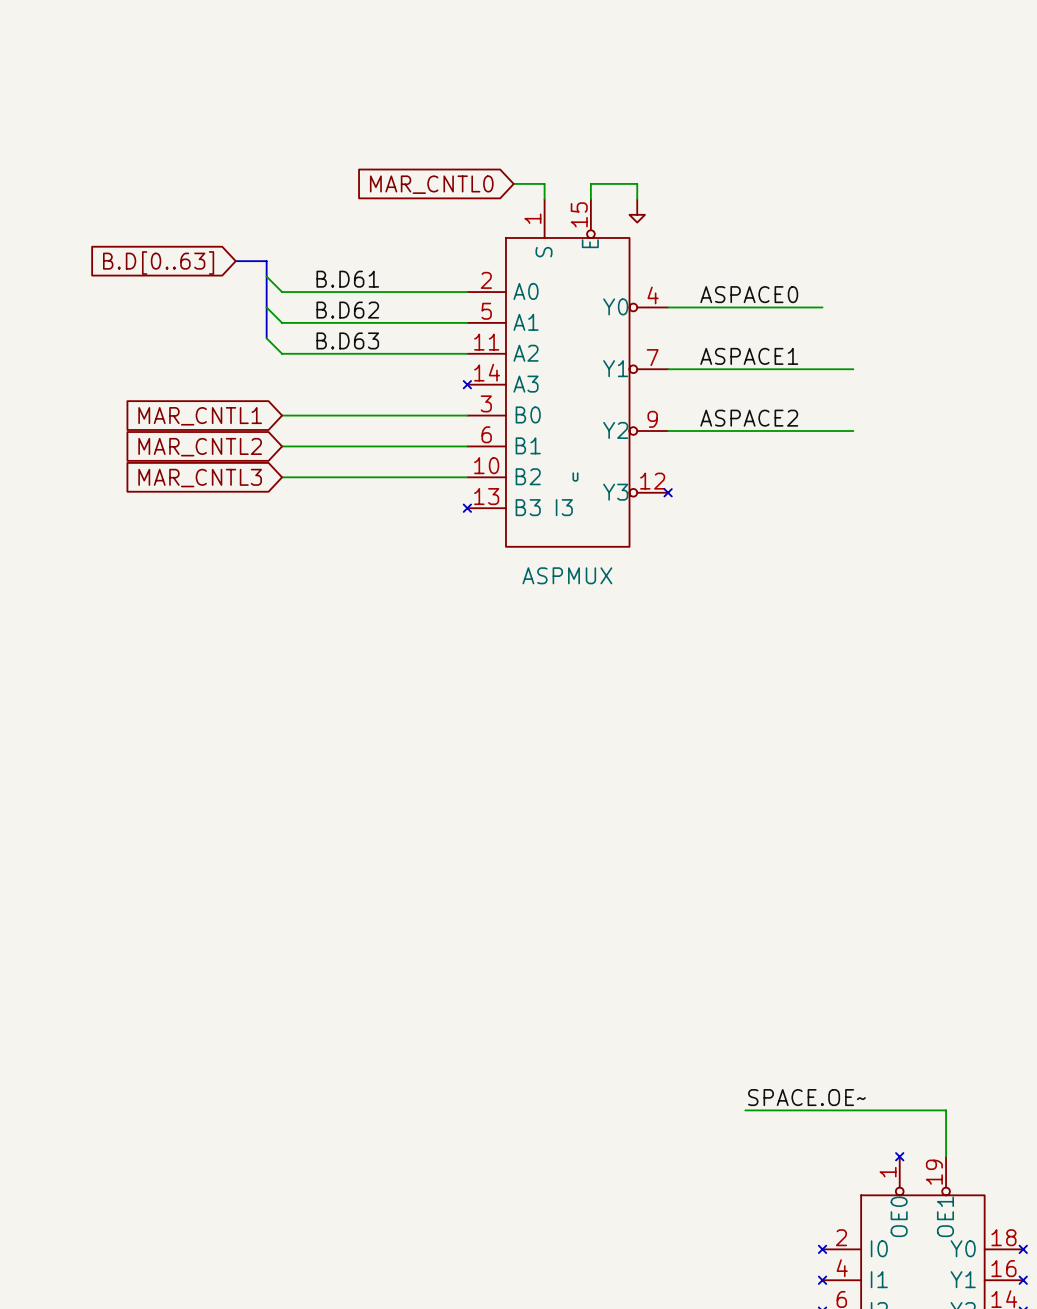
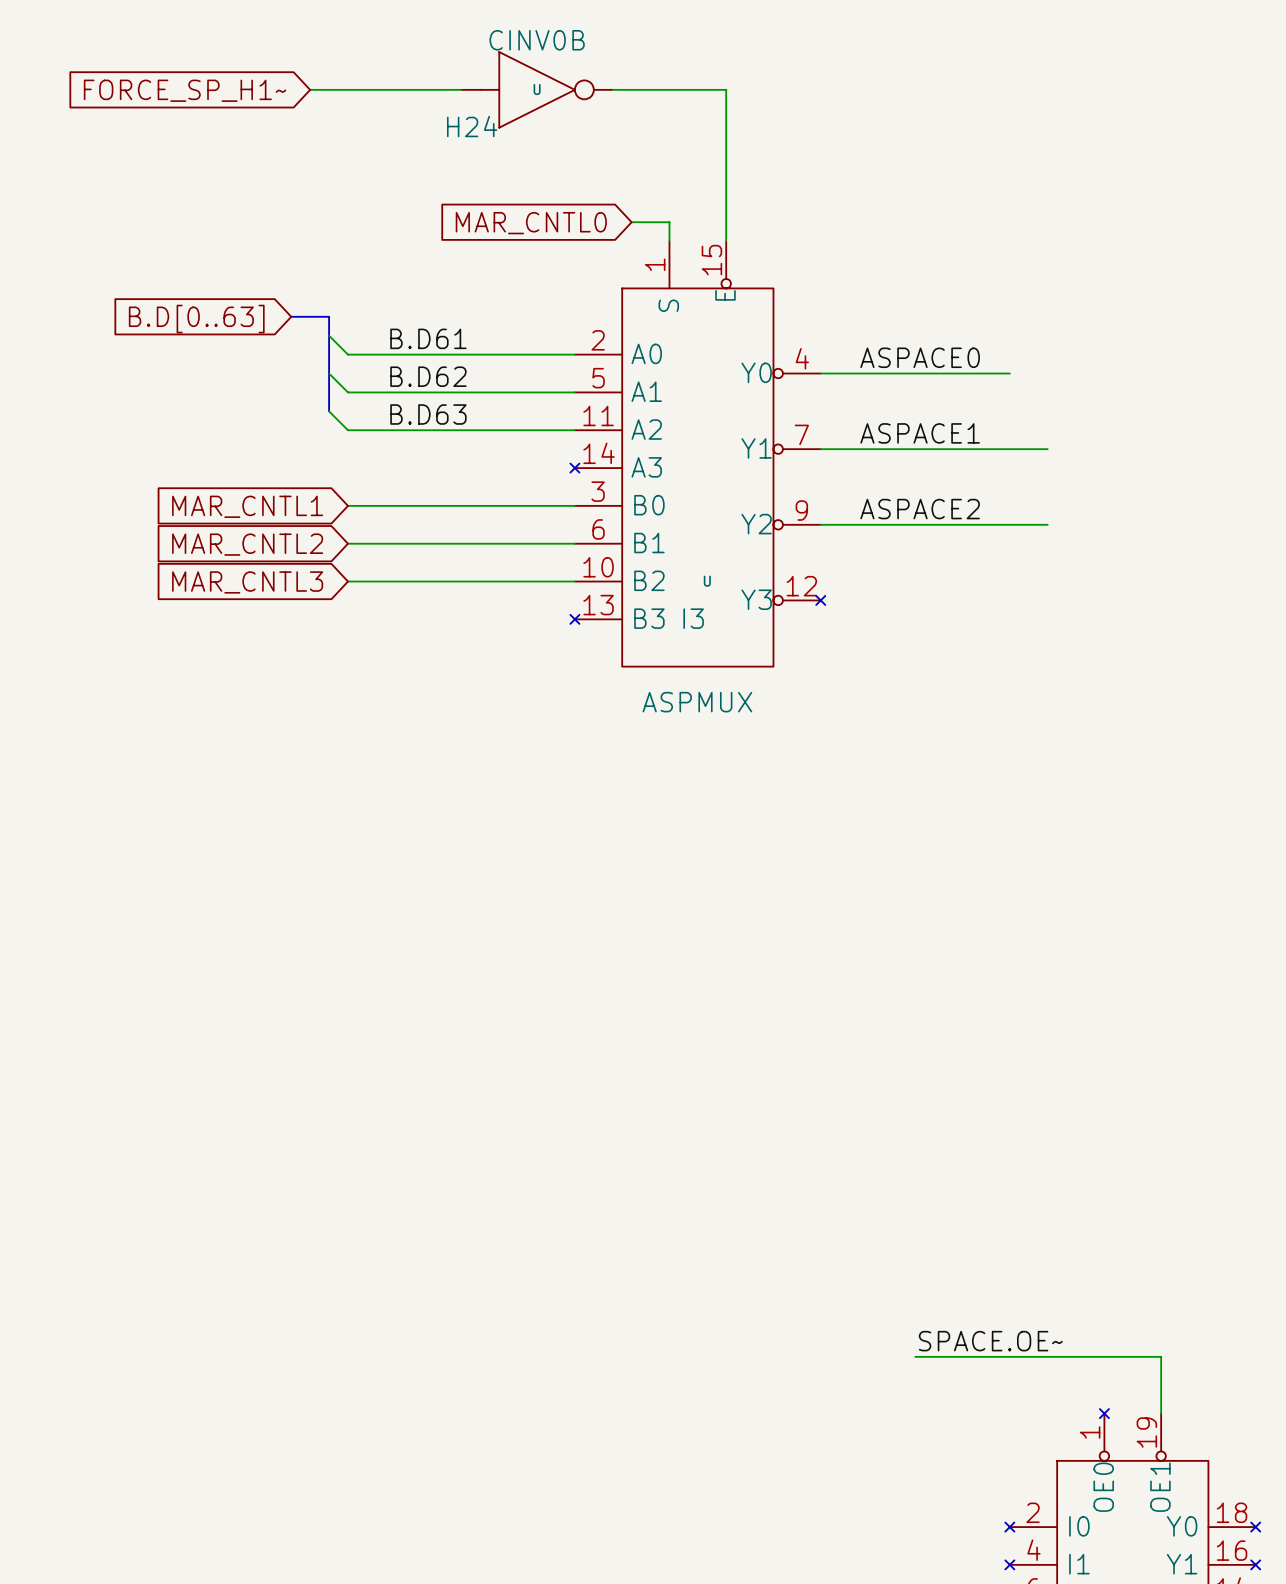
wire: none -> (310, 89) (461, 89)
U: none -> (537, 89)
global label: none -> FORCE_SP_H1~ (185, 90)
wire: (590, 183) (637, 183) (637, 199) -> (726, 222) (726, 89) (612, 89)
power symbol: (637, 211) -> none

